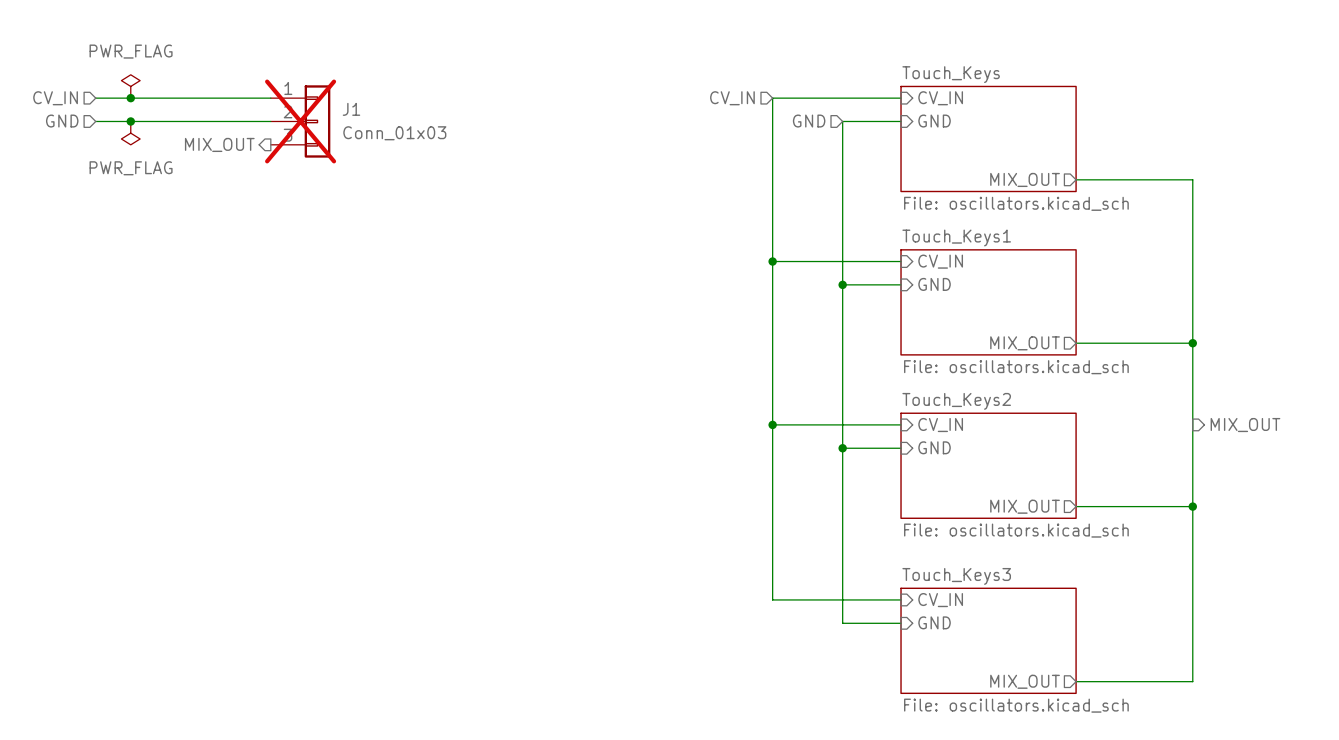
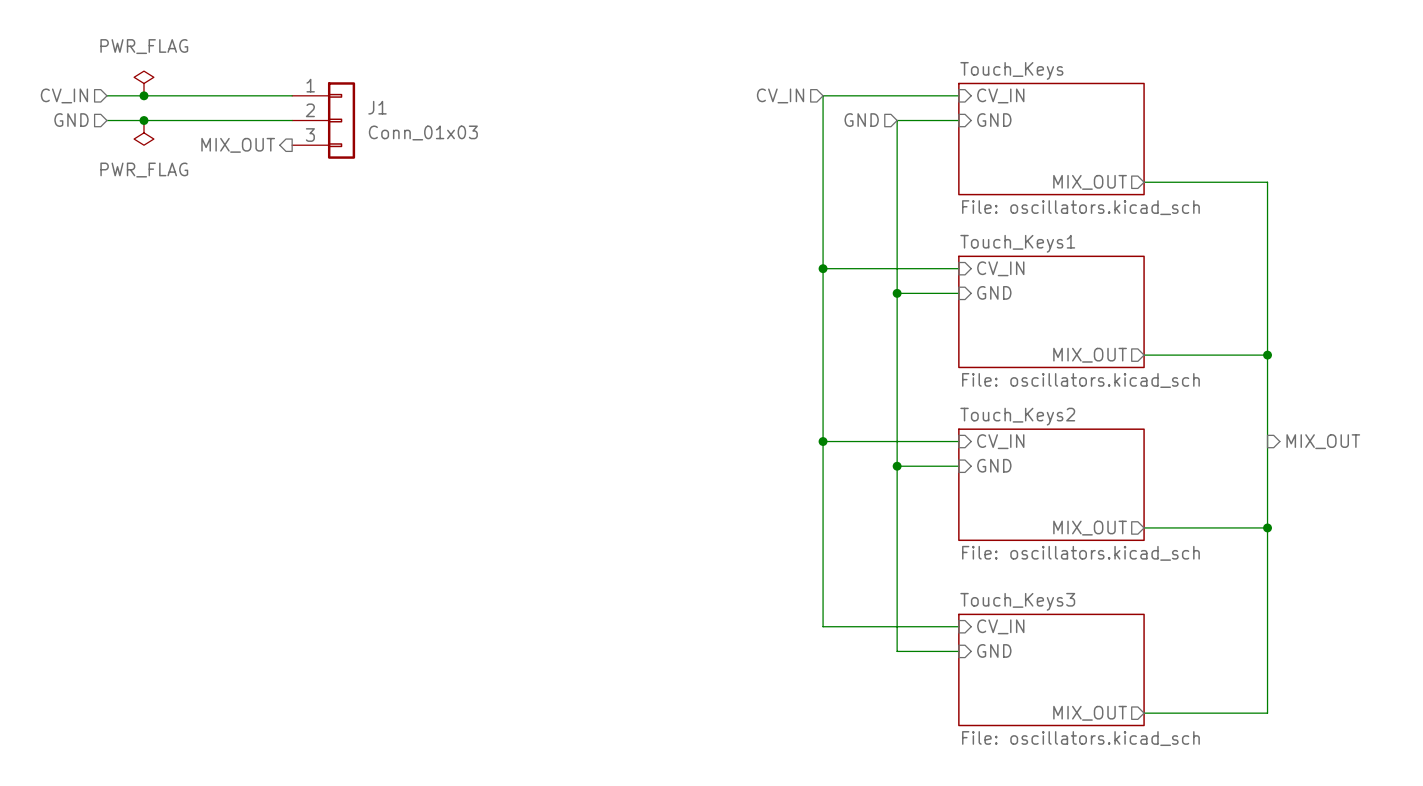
J1 do-not-place cross: (300, 121) -> none

